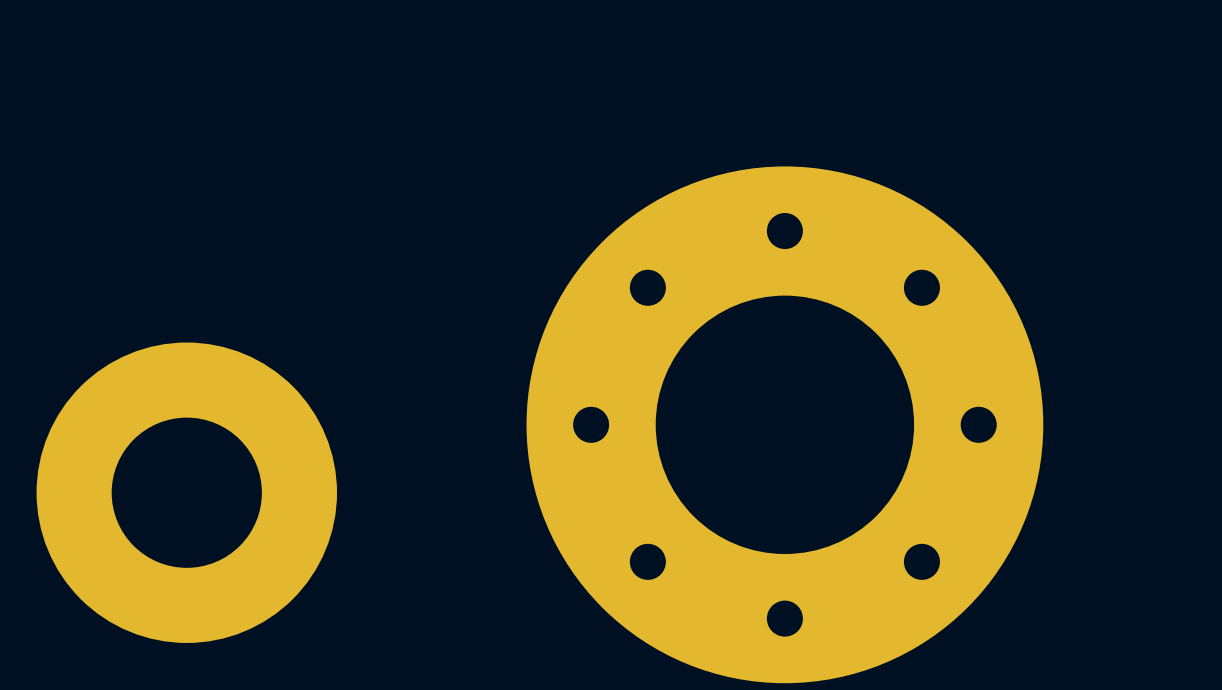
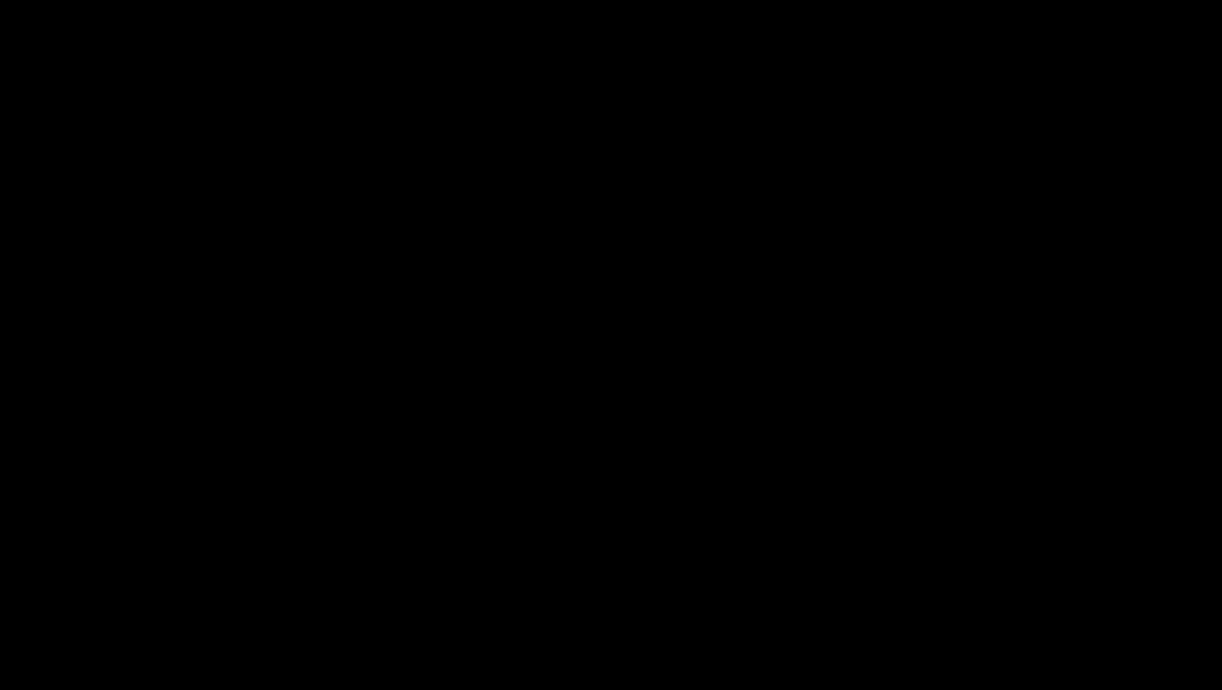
part: (784, 424) -> none
part: (186, 492) -> none

